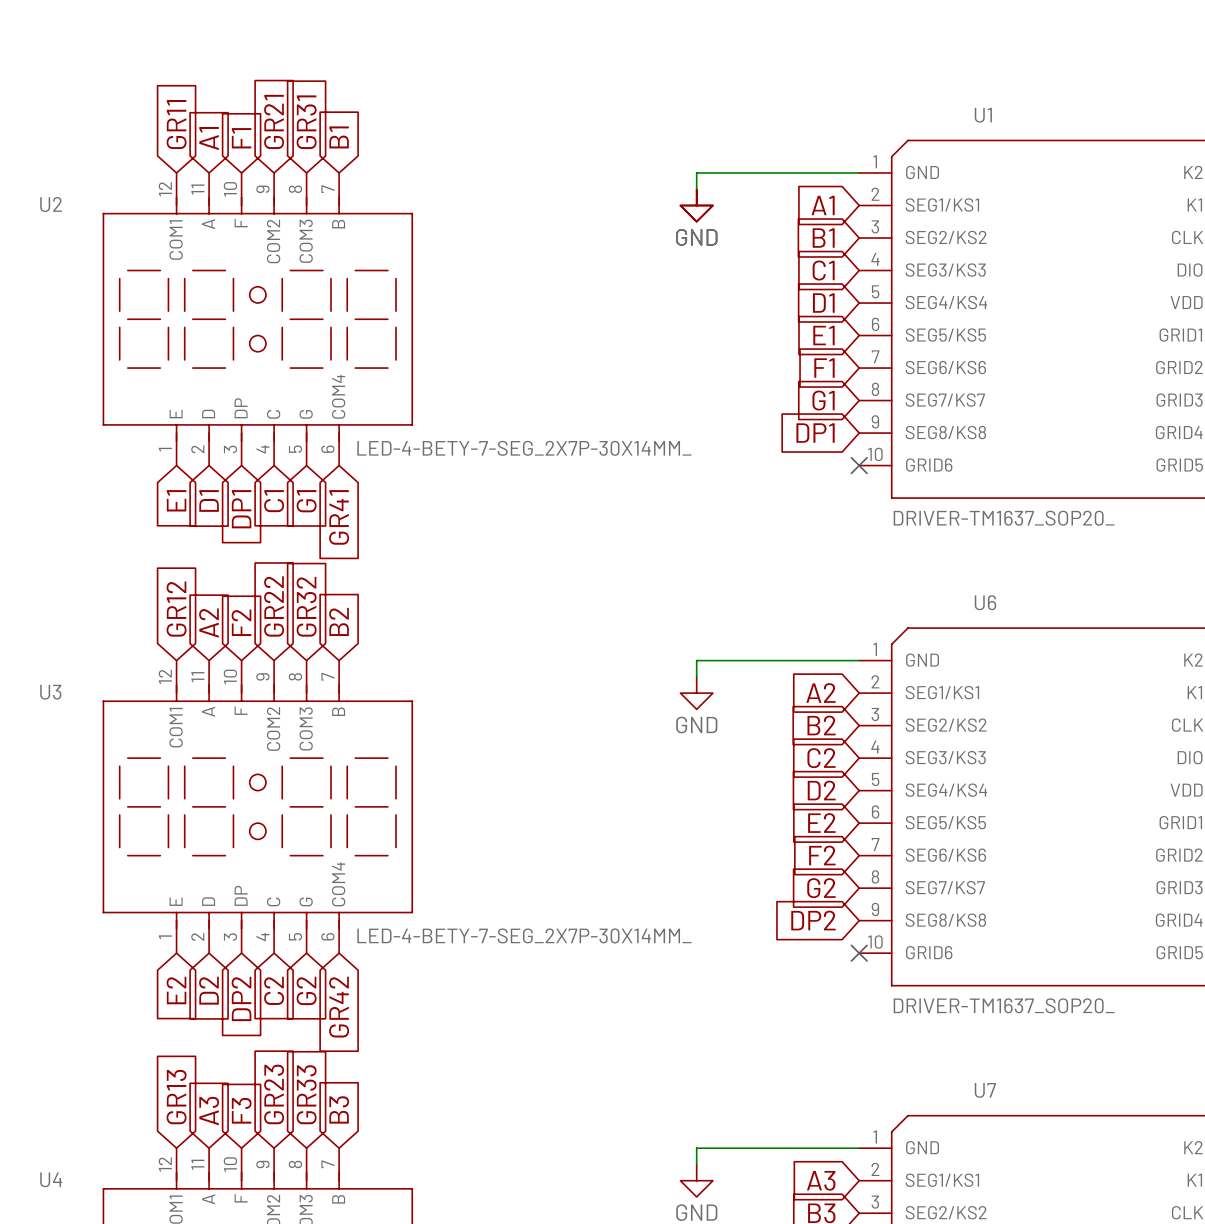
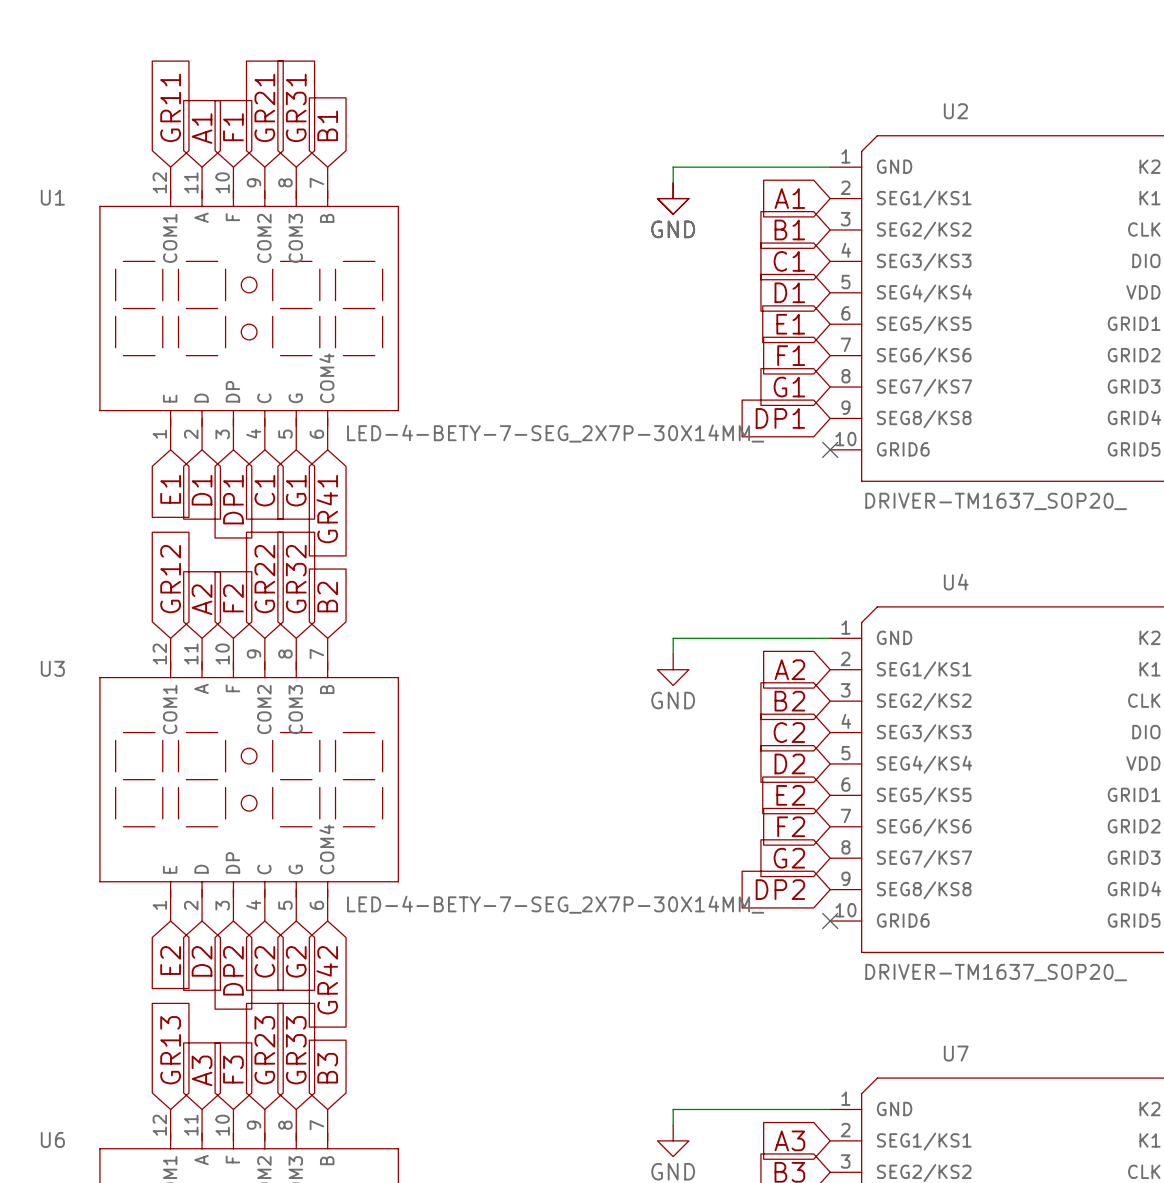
U1 name: U1 (983, 115) -> U2 (955, 111)
U2 name: U2 (51, 204) -> U1 (52, 197)
U6 name: U6 (985, 602) -> U4 (956, 582)
U4 name: U4 (51, 1179) -> U6 (52, 1139)

